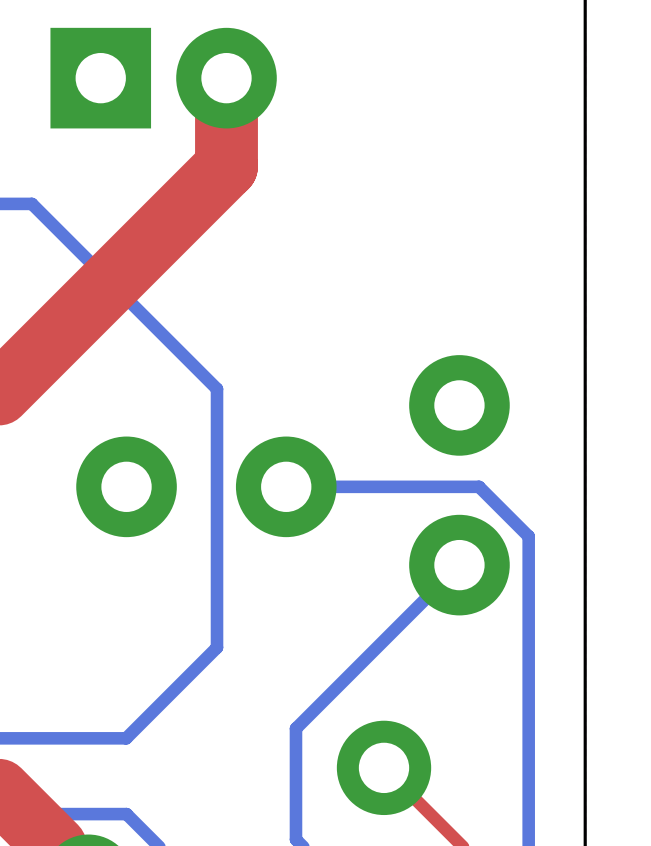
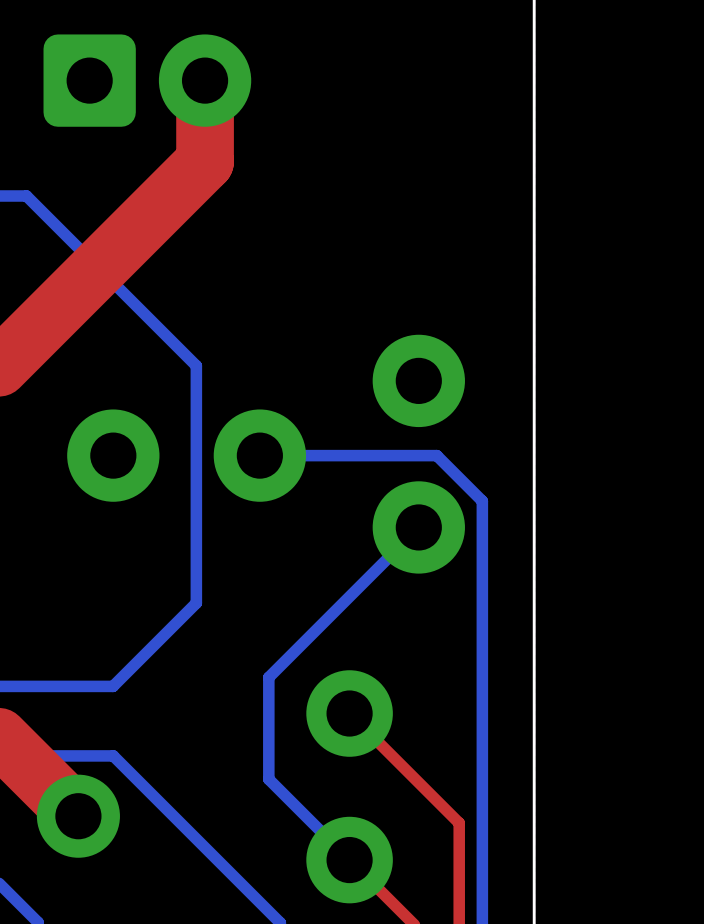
part footprint: [50, 27, 277, 129] -> [43, 34, 252, 127]

